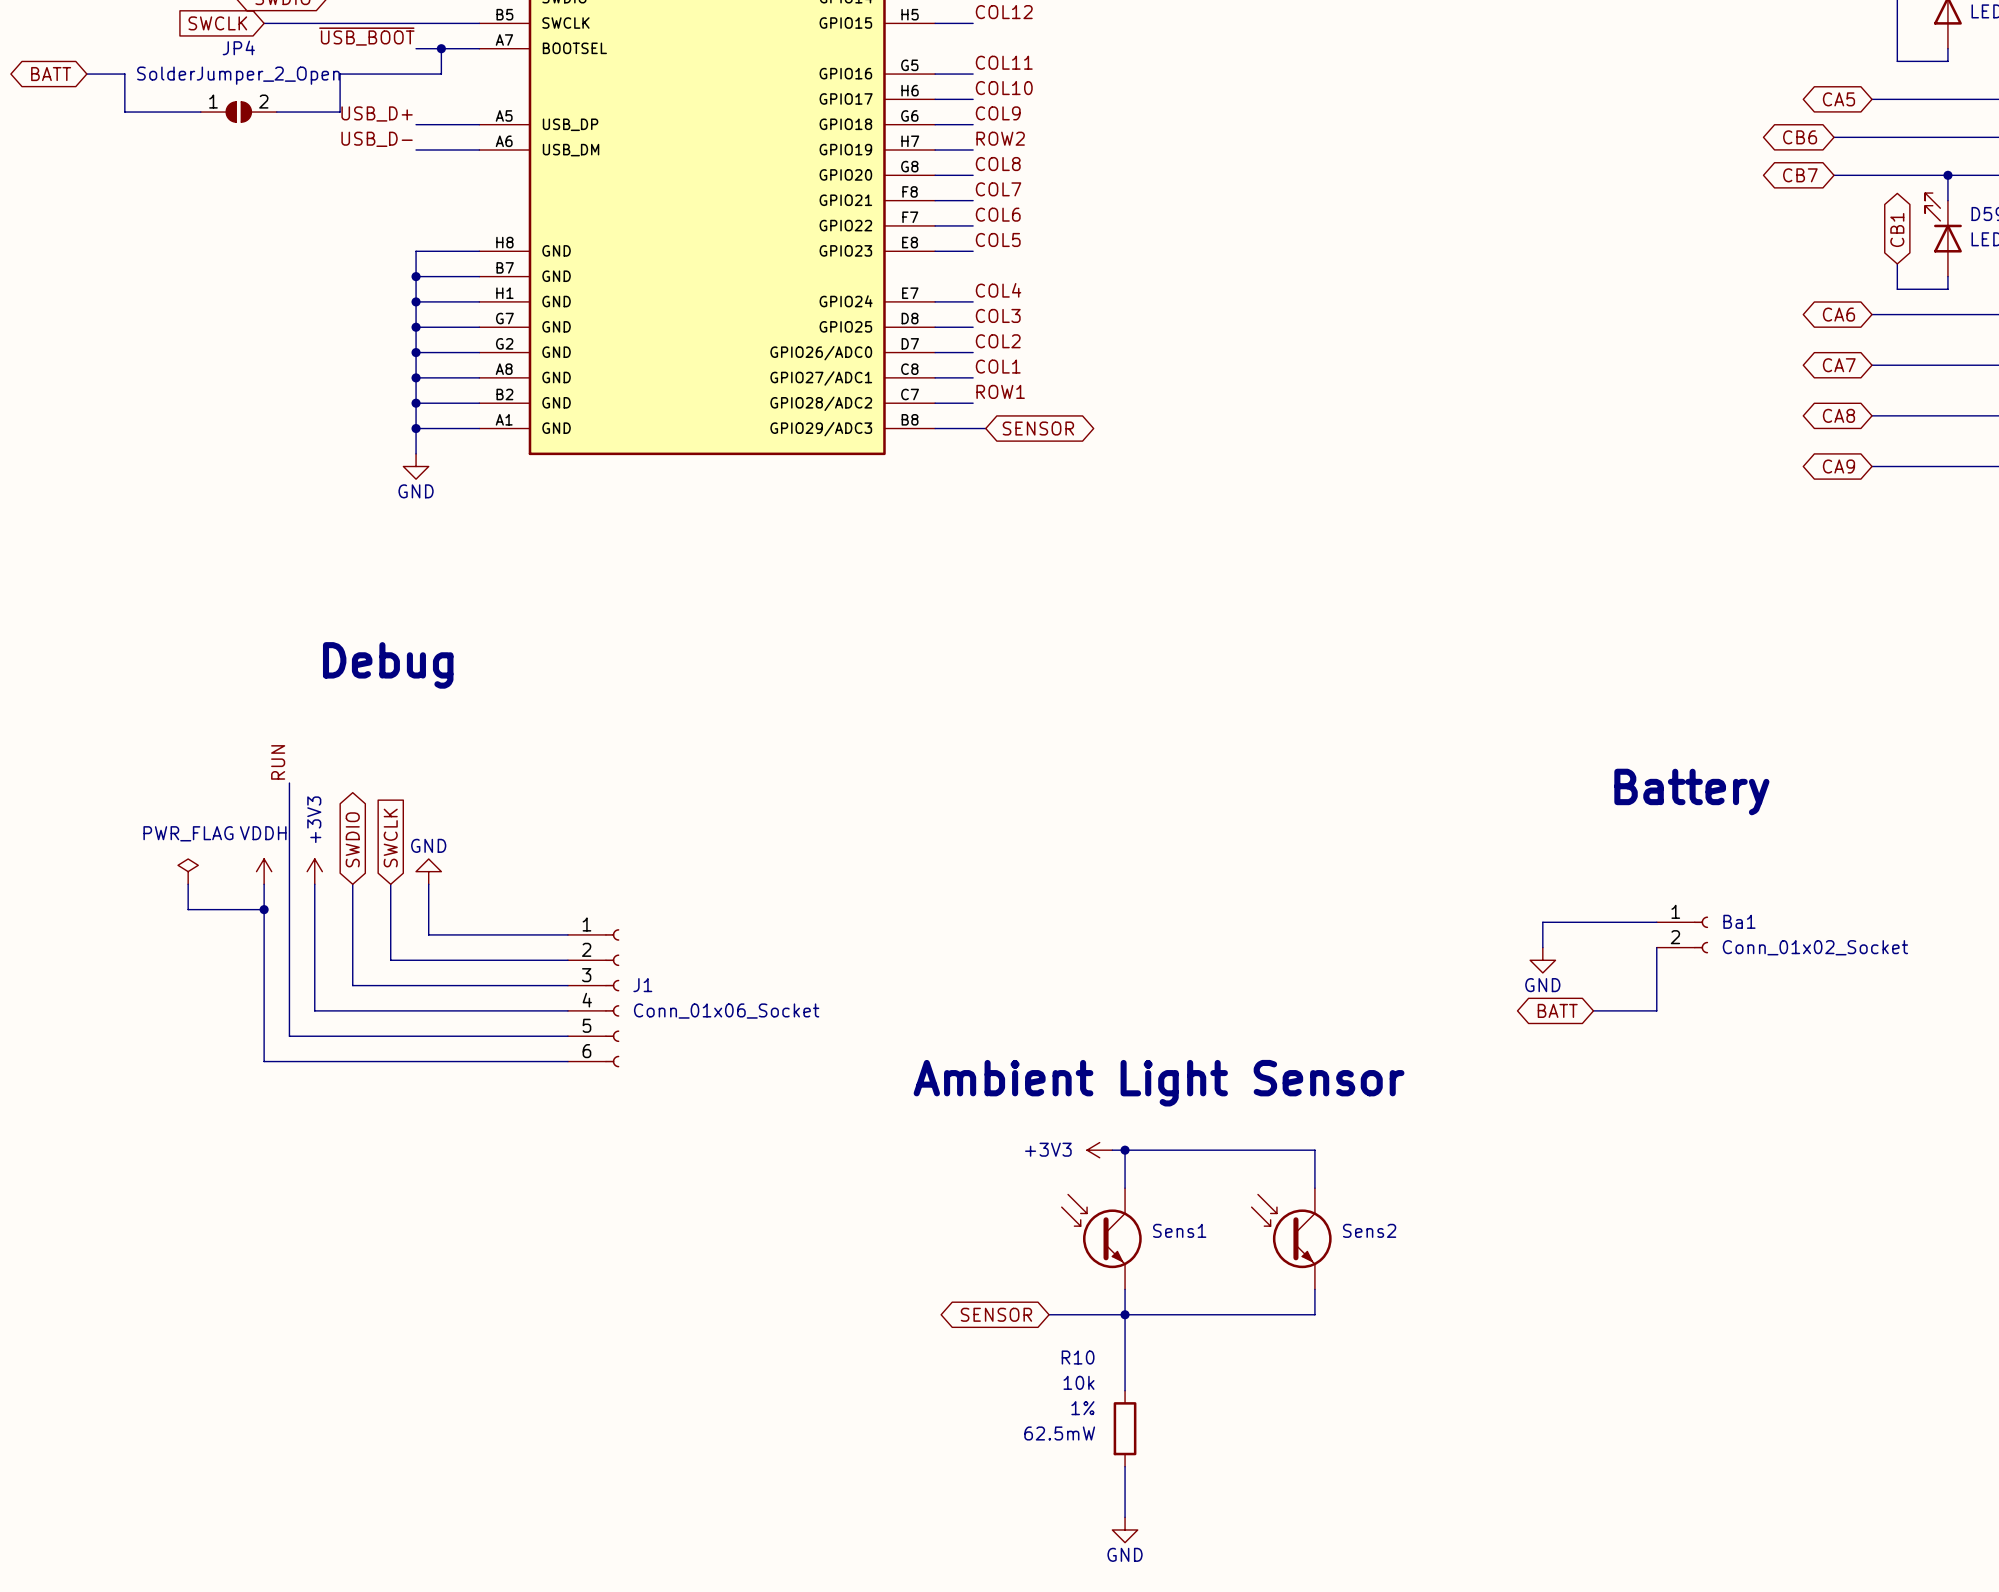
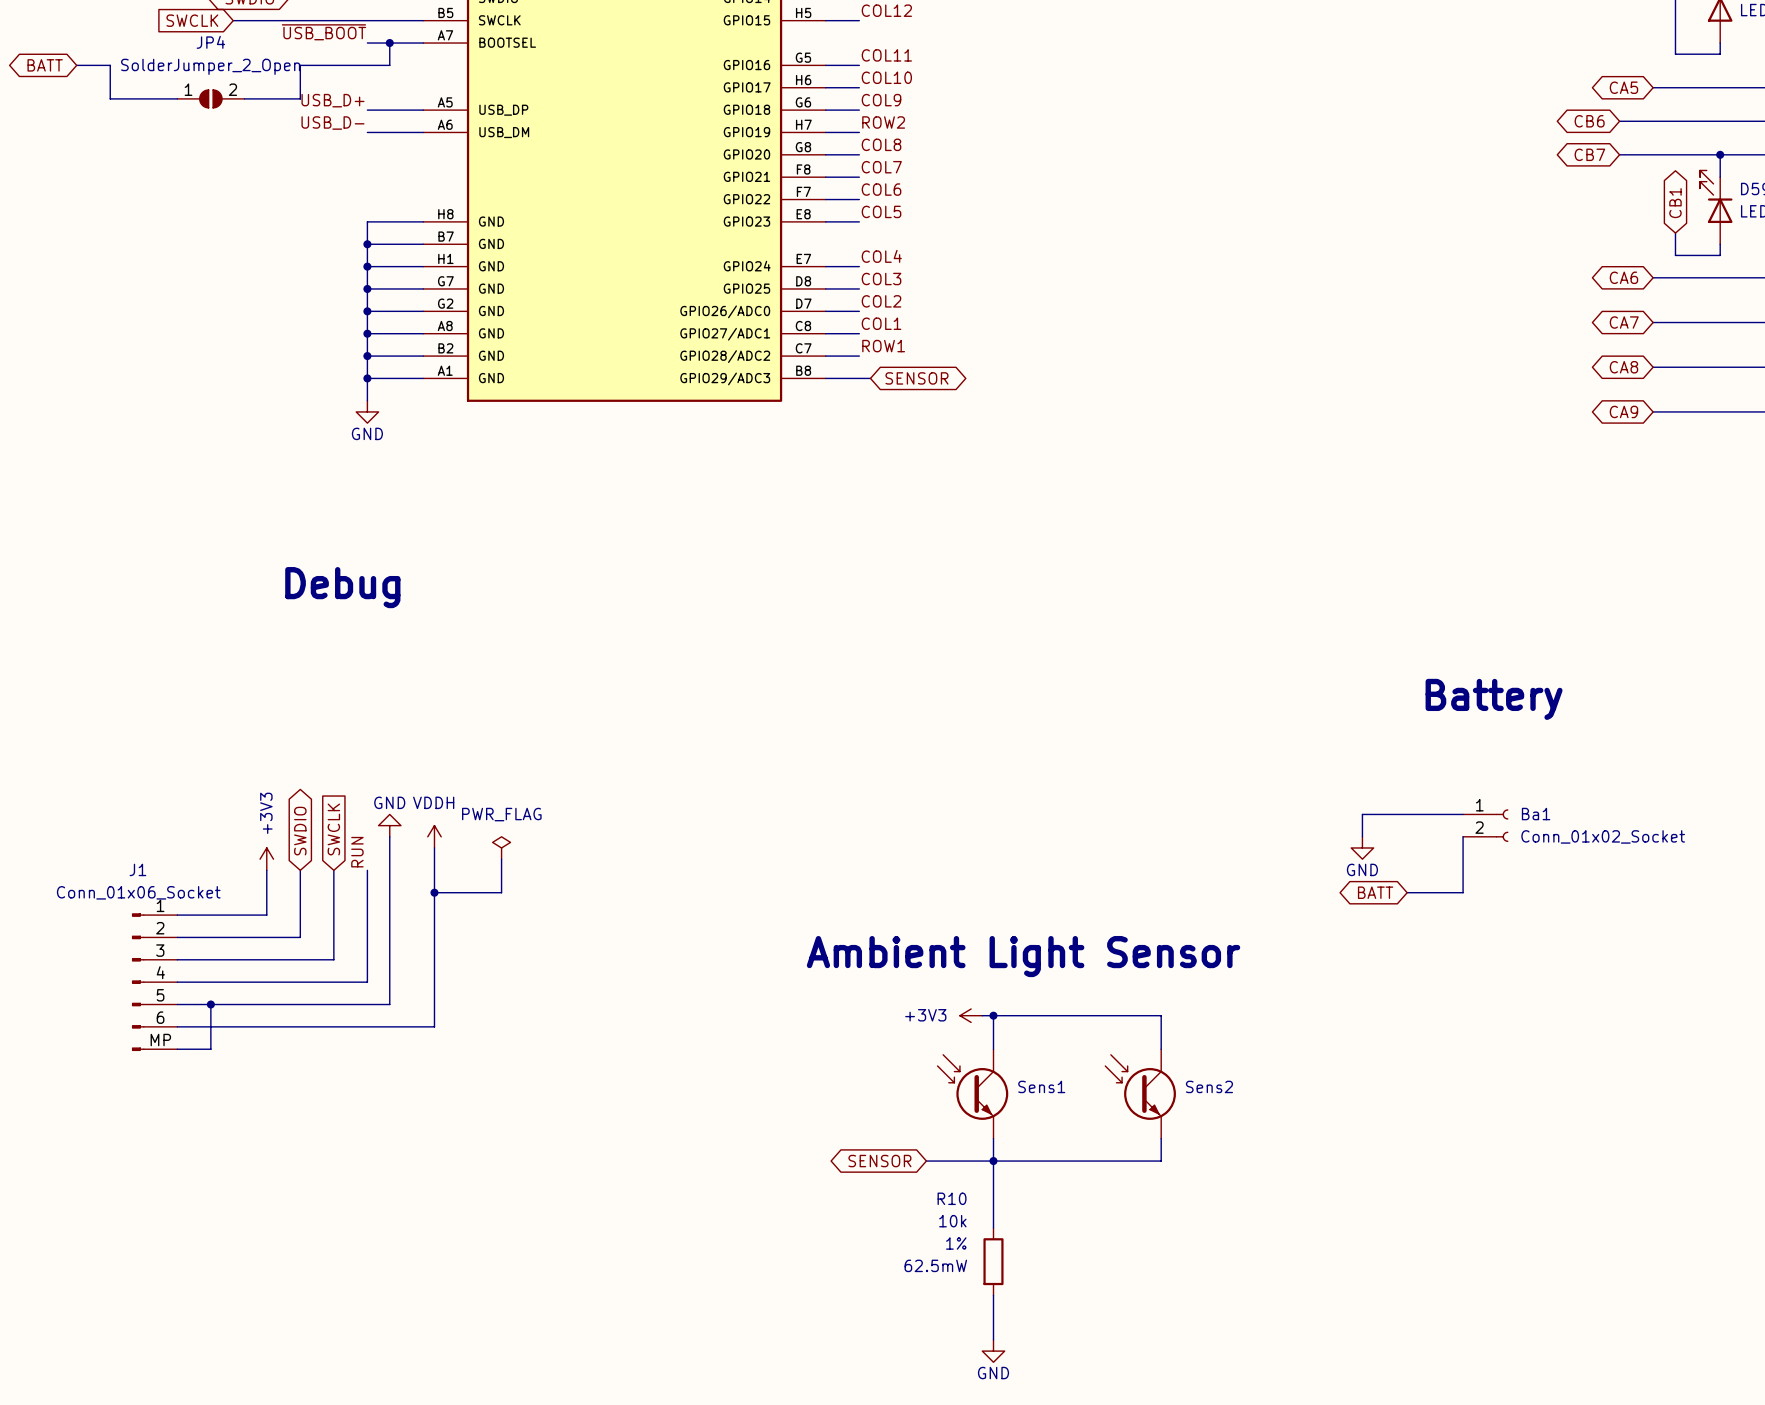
label position: RUN (278, 762) -> RUN (357, 852)
wire: (289, 783) (289, 1036) -> (177, 915) (255, 915)
global label position: SWCLK (390, 838) -> SWCLK (333, 829)
global label position: SWDIO (352, 839) -> SWDIO (300, 831)
power symbol: PWR_FLAG (188, 871) -> none
power symbol position: VDDH (264, 871) -> VDDH (434, 836)
power symbol position: +3V3 (314, 871) -> +3V3 (266, 859)
power symbol position: GND (428, 871) -> GND (389, 825)
wire: (188, 884) (188, 909) (264, 909) -> none
wire: (264, 884) (264, 1061) -> (177, 937) (233, 937)
wire: (314, 884) (314, 1010) (492, 1010) -> none
wire: (352, 884) (352, 985) (567, 985) -> none
wire: (390, 884) (390, 960) (567, 960) -> none
wire: (428, 884) (428, 934) (567, 934) -> none
junction: (264, 909) -> none
J1 symbol: [567, 929, 620, 1068] -> [131, 913, 178, 1052]
wire: none -> (389, 836) (389, 1004) (177, 1004)
wire: none -> (434, 847) (434, 1026) (177, 1026)
power symbol: none -> PWR_FLAG (501, 847)
wire: none -> (501, 859) (501, 892)
wire: none -> (333, 870) (333, 959) (177, 959)
wire: none -> (367, 870) (367, 982) (177, 982)
J1 name position: J1 (642, 985) -> J1 (137, 869)
junction: none -> (434, 892)
J1 value position: Conn_01x06_Socket (726, 1011) -> Conn_01x06_Socket (138, 892)
wire: (302, 1036) (567, 1036) -> (266, 915) (266, 870)
wire: (340, 1061) (567, 1061) -> (300, 937) (300, 870)
wire: none -> (210, 1004) (210, 1049) (177, 1049)
junction: none -> (210, 1004)

